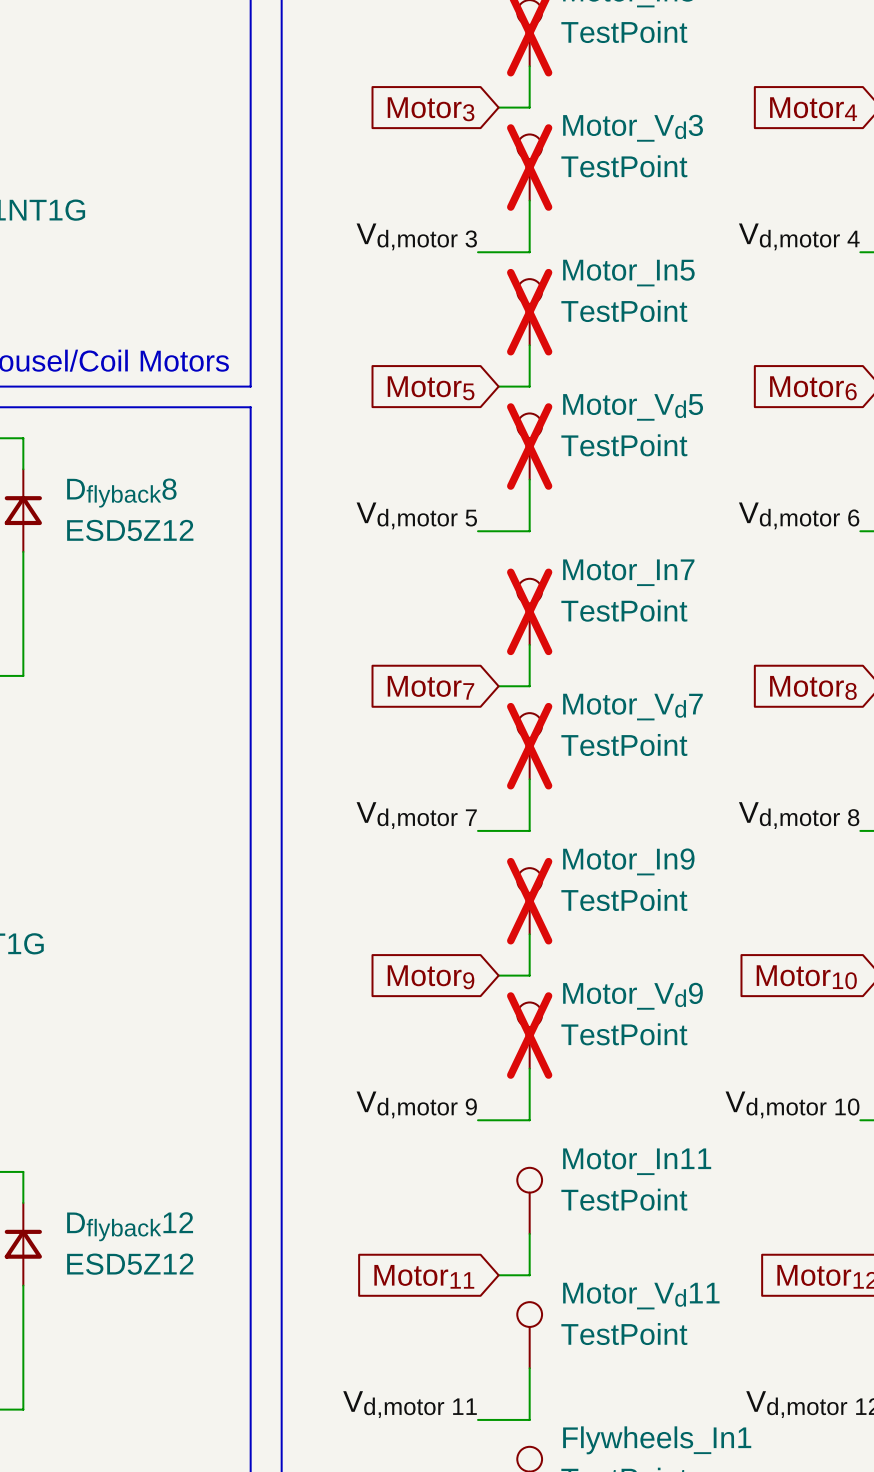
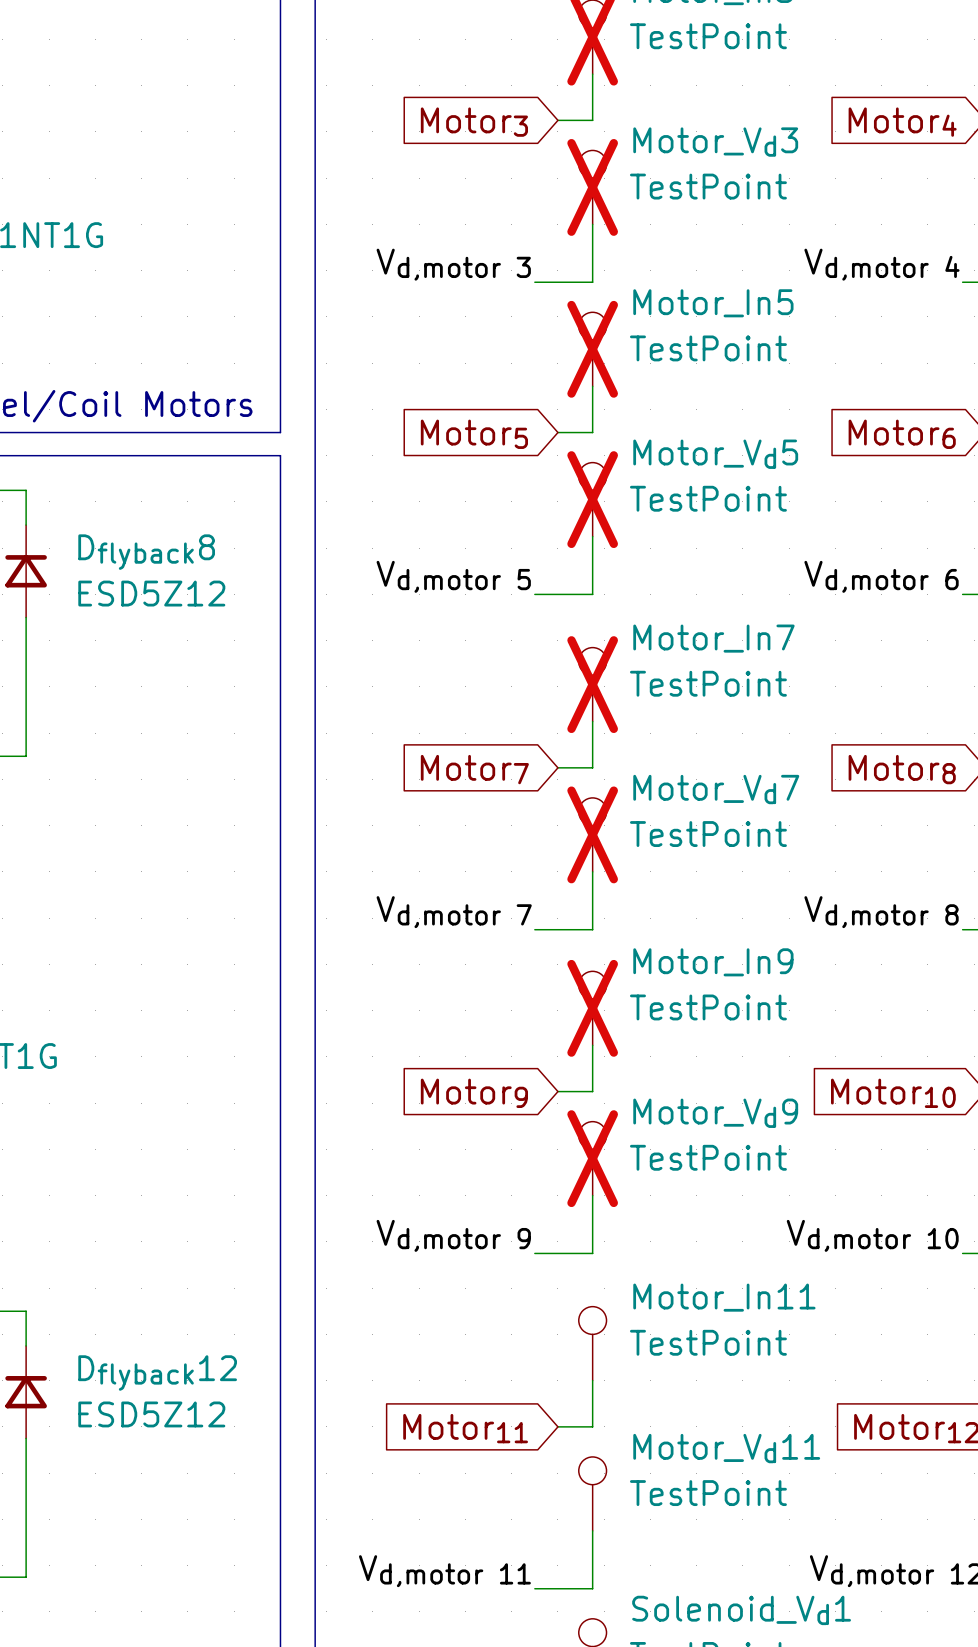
Flywheels_In1 name: Flywheels_In1 (657, 1440) -> Solenoid_Vd1 (741, 1610)

